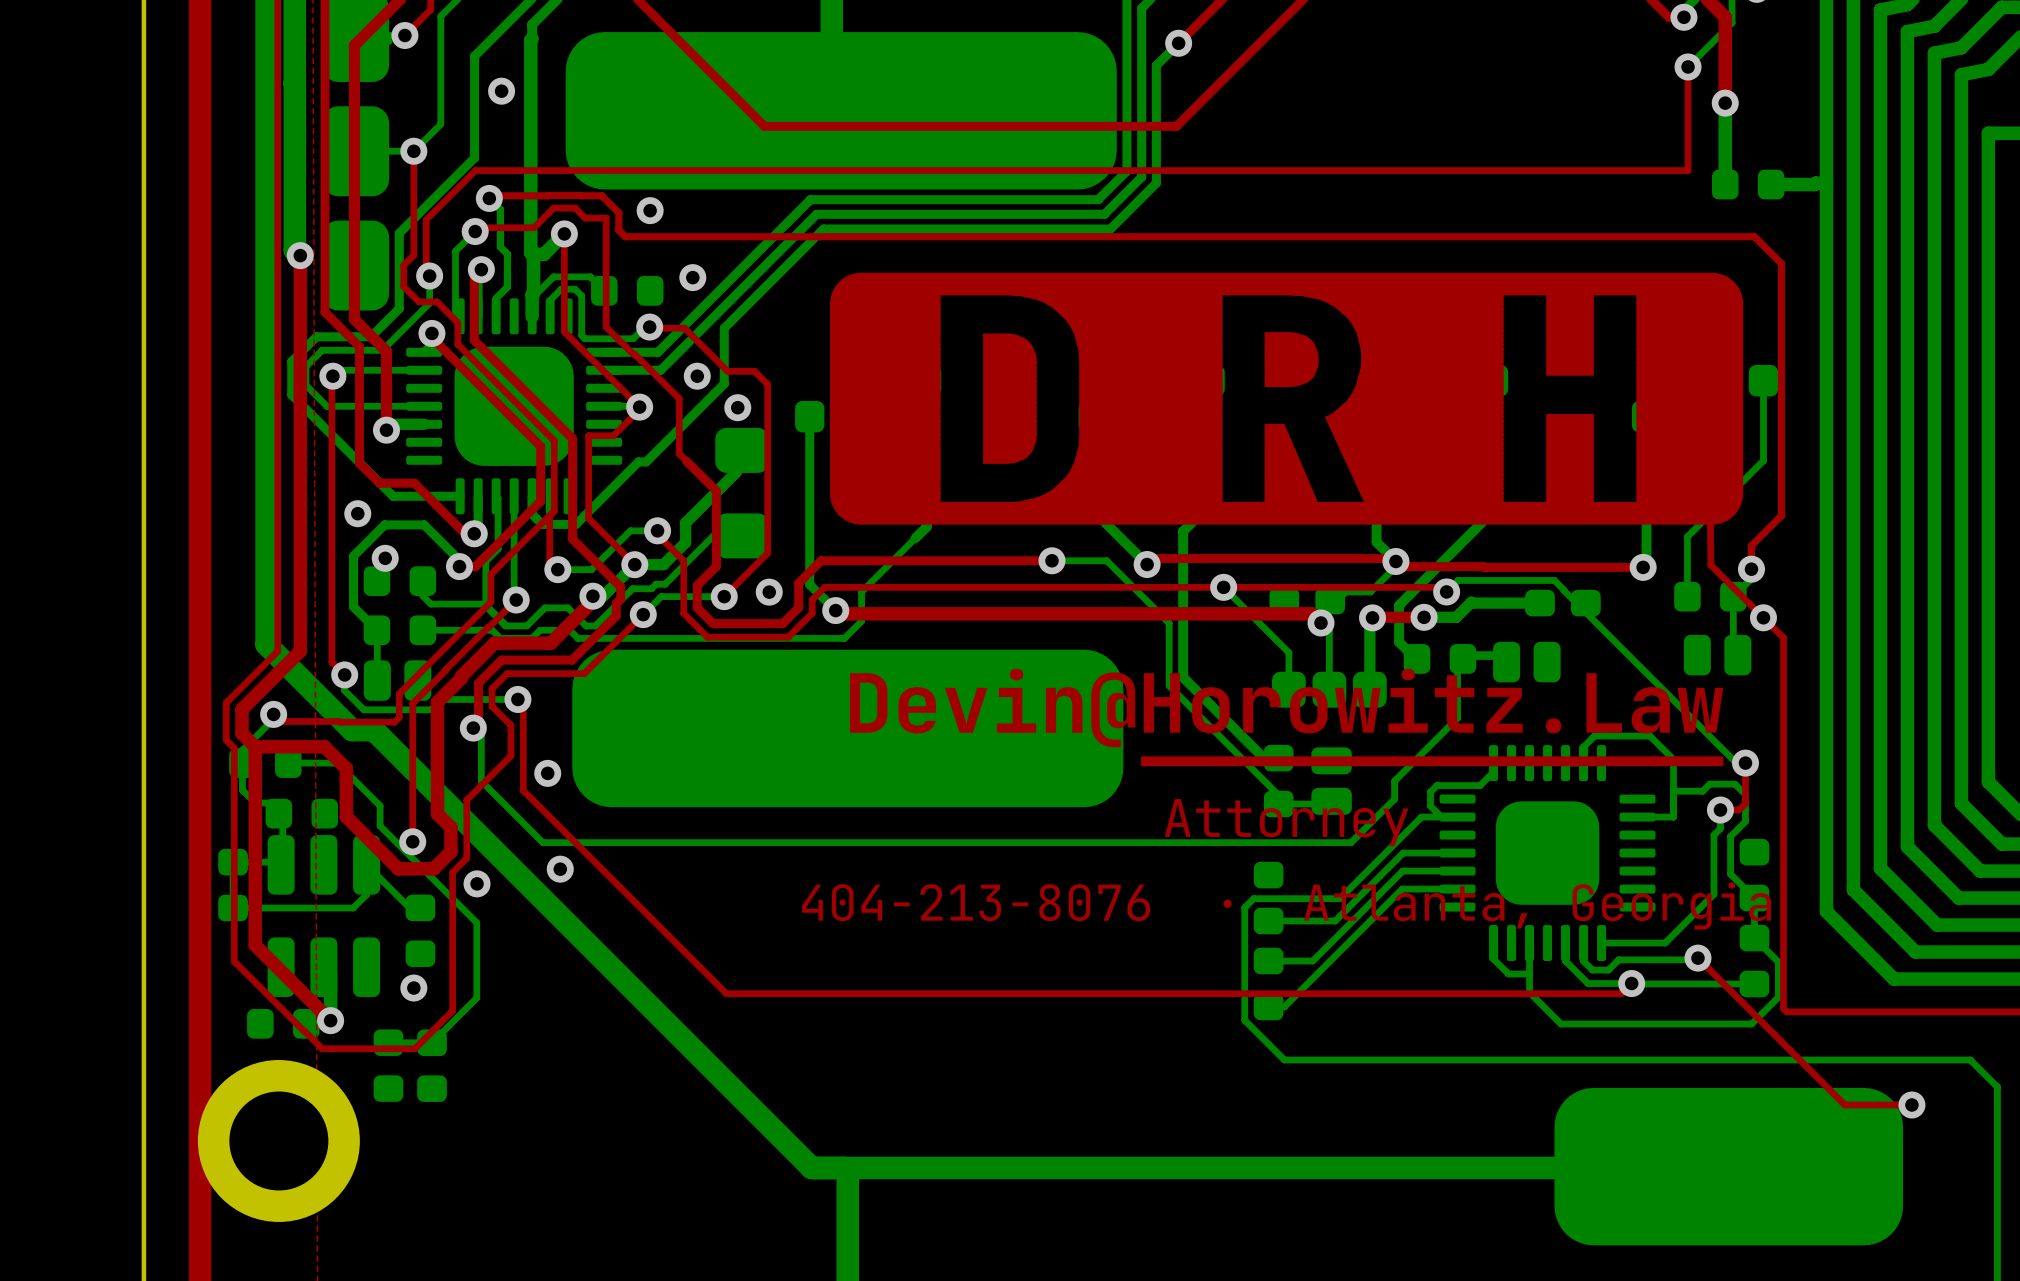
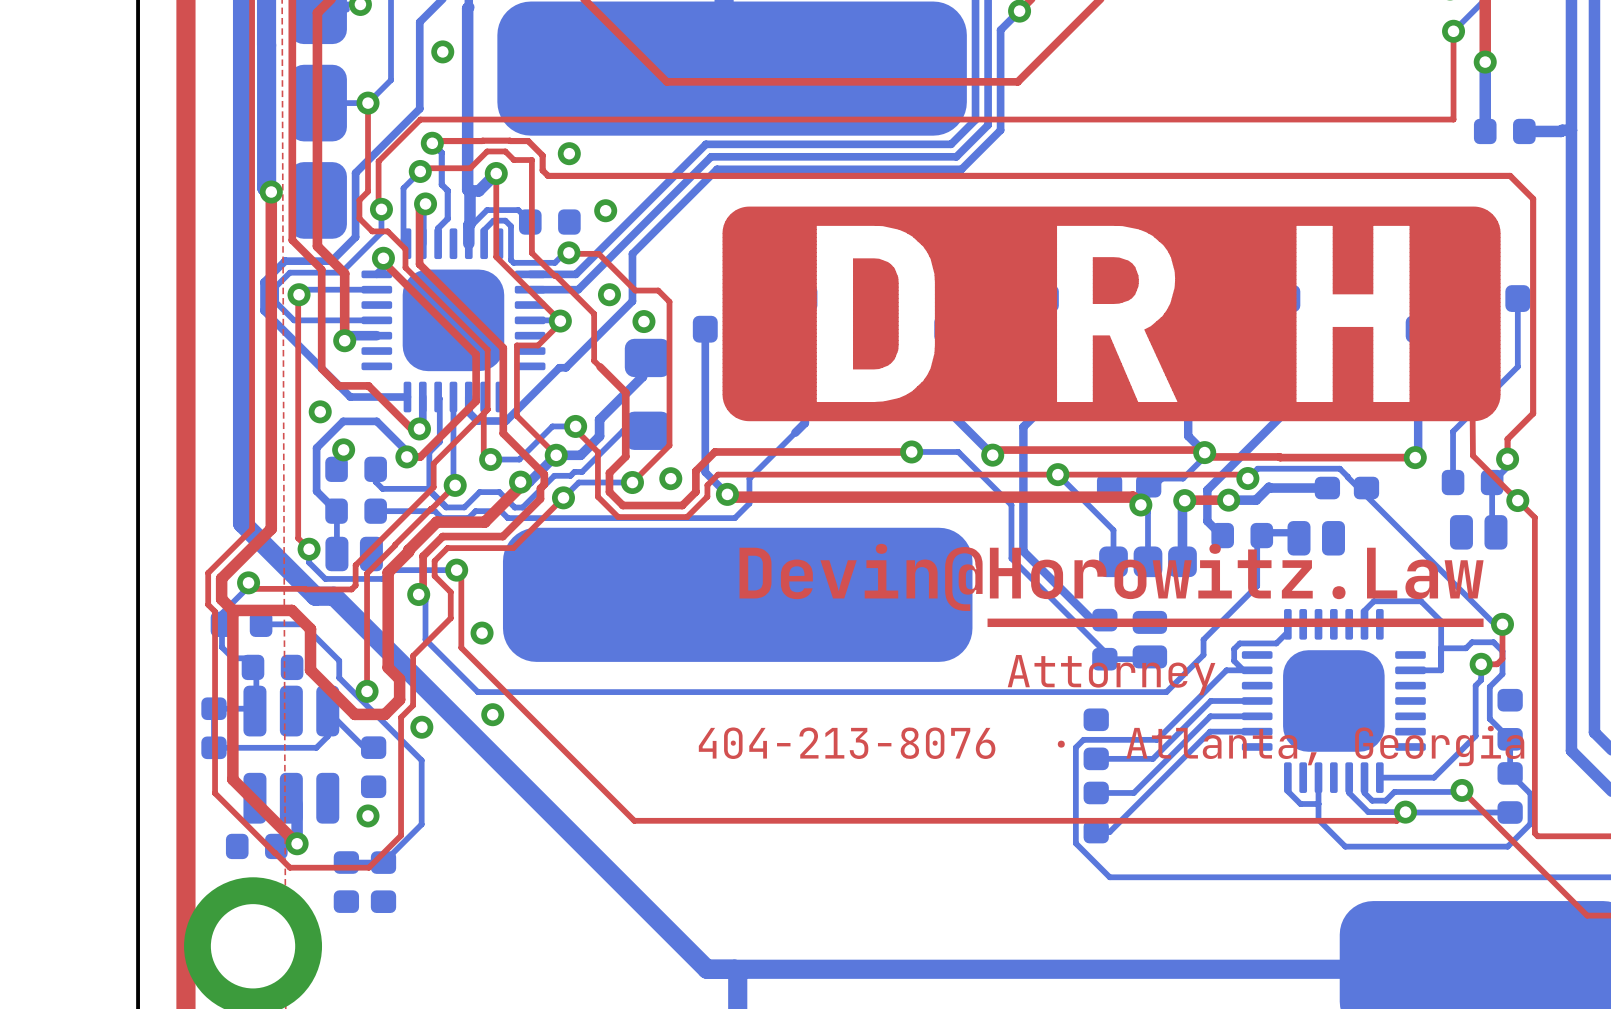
part footprint: [1439, 745, 1656, 962] -> [1241, 609, 1426, 793]

